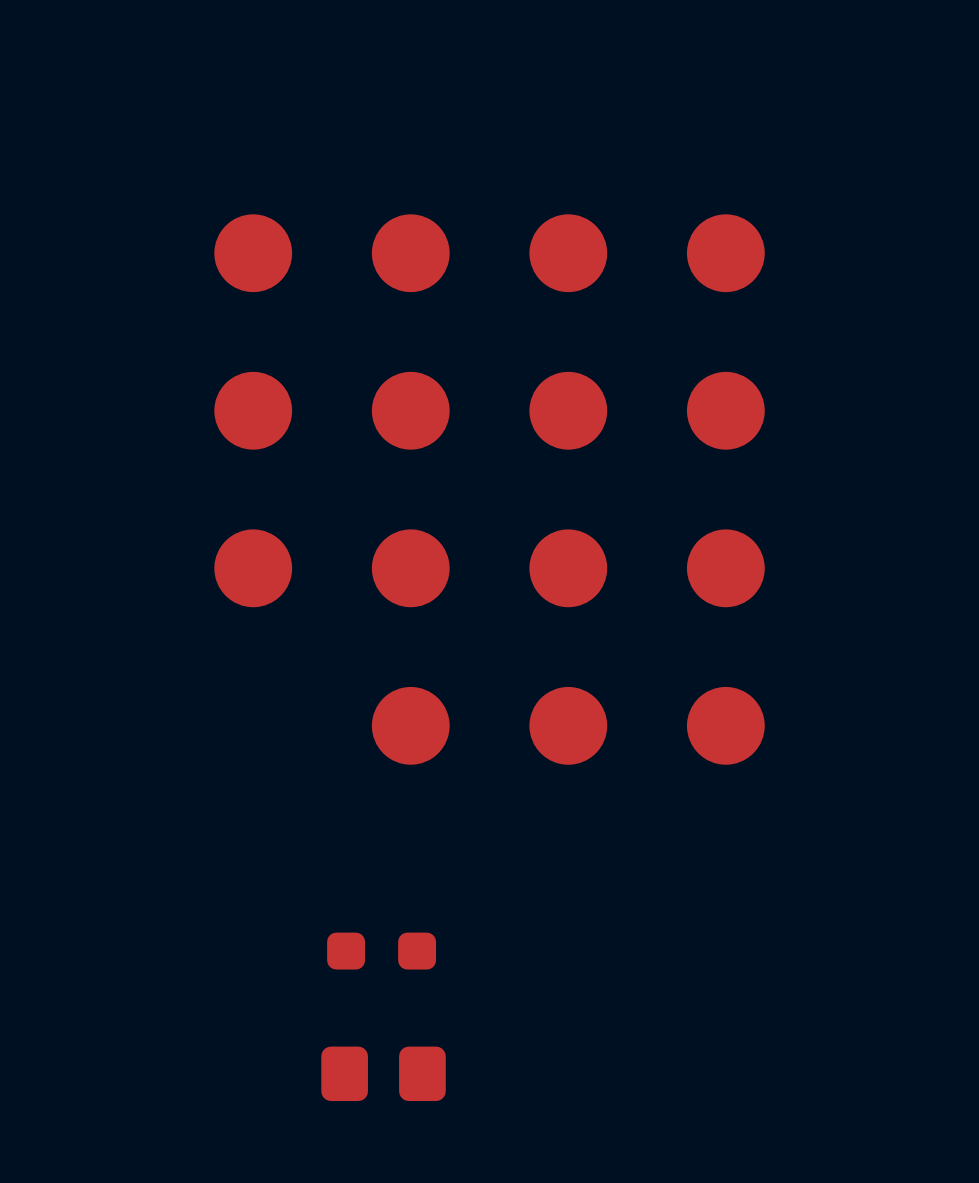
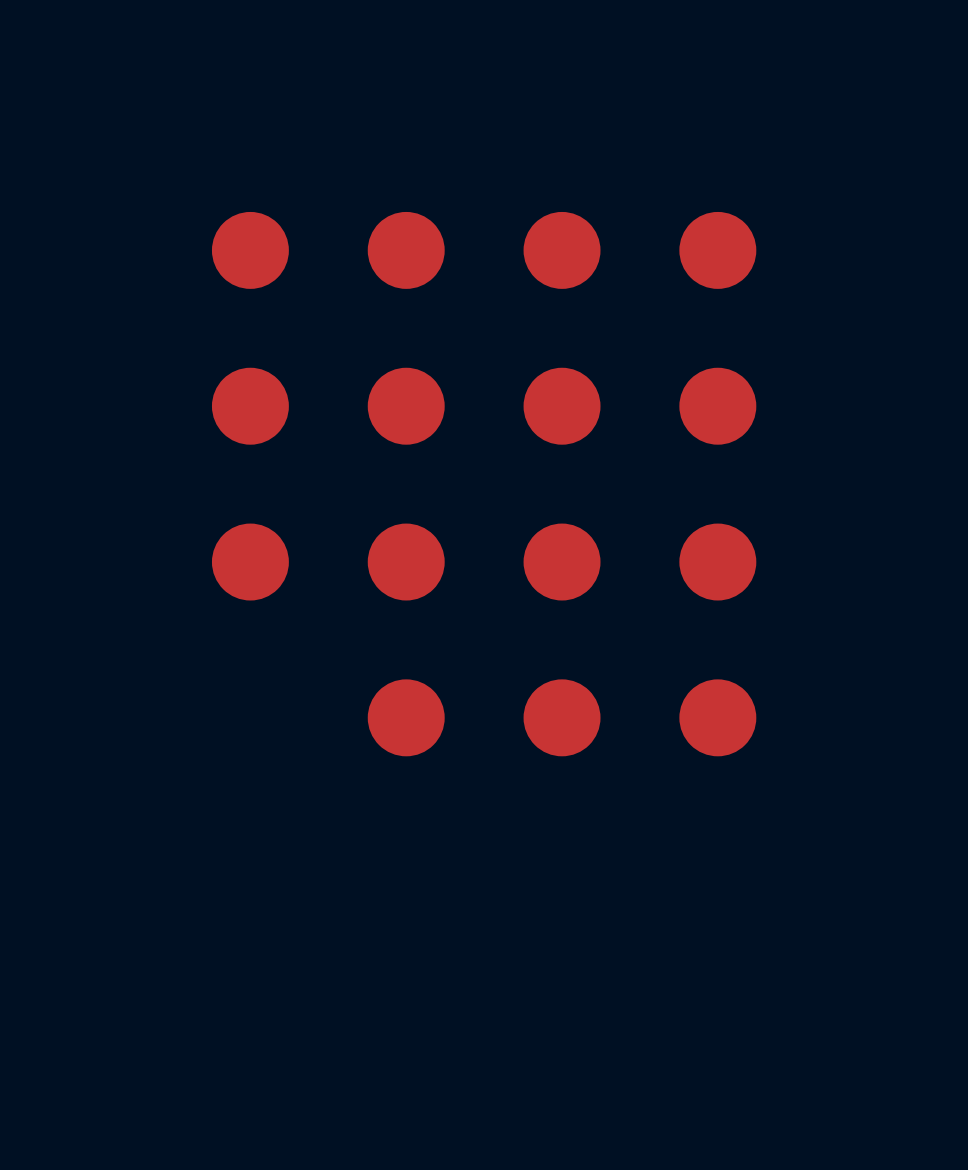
part: (381, 951) -> none
part: (383, 1073) -> none

